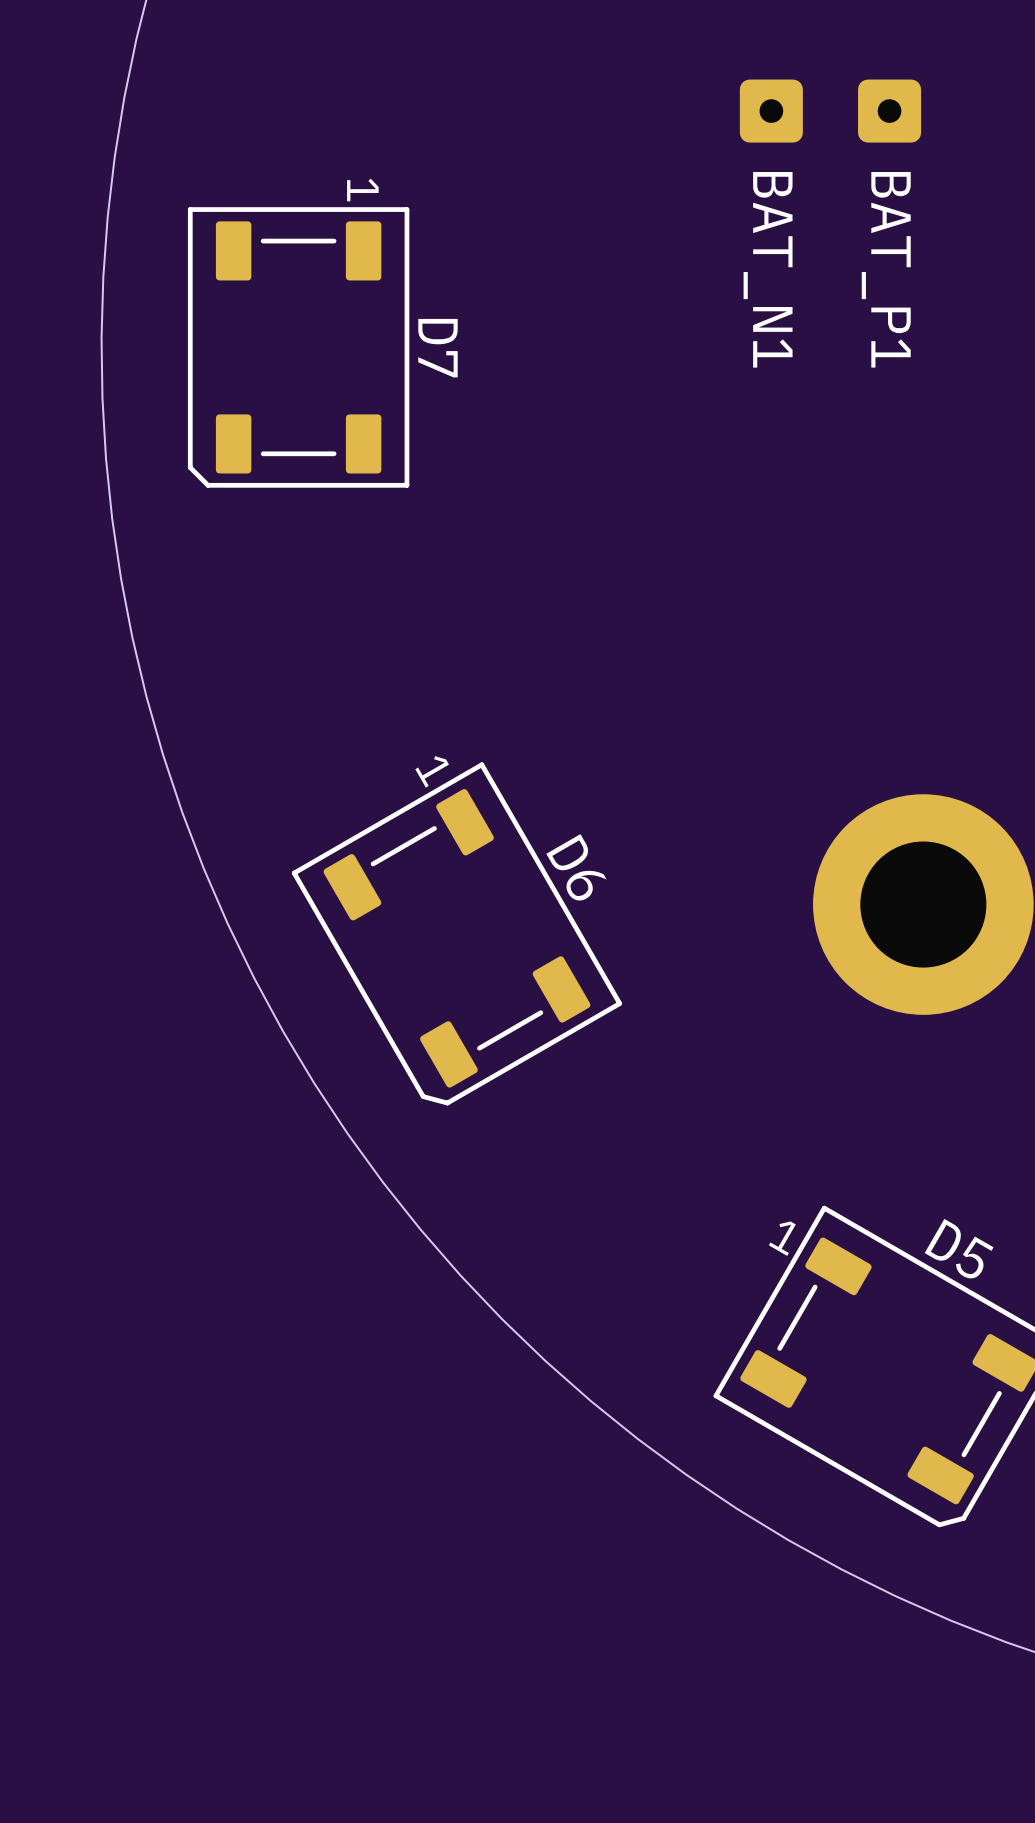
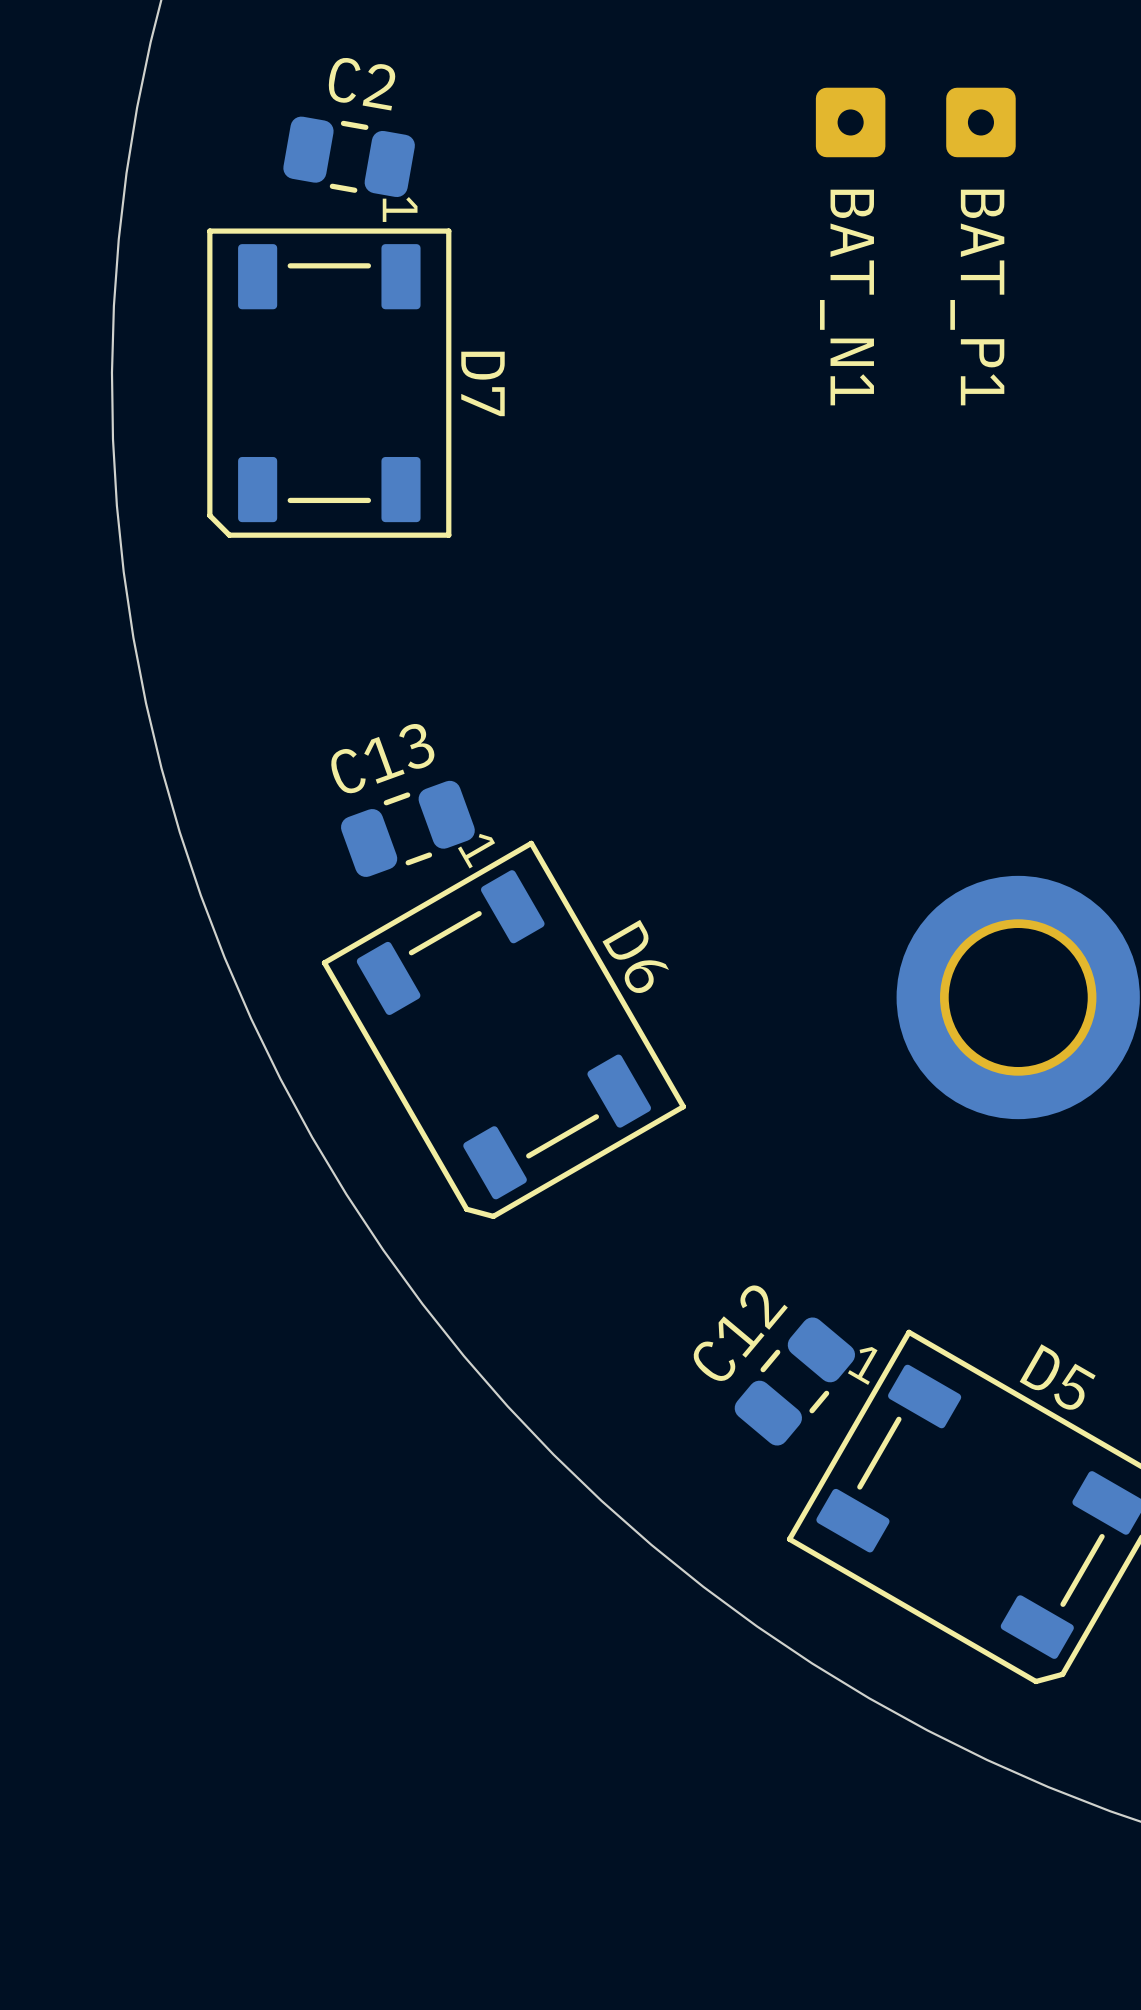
C2: none -> (349, 156)
C13: none -> (407, 828)
C12: none -> (794, 1381)

